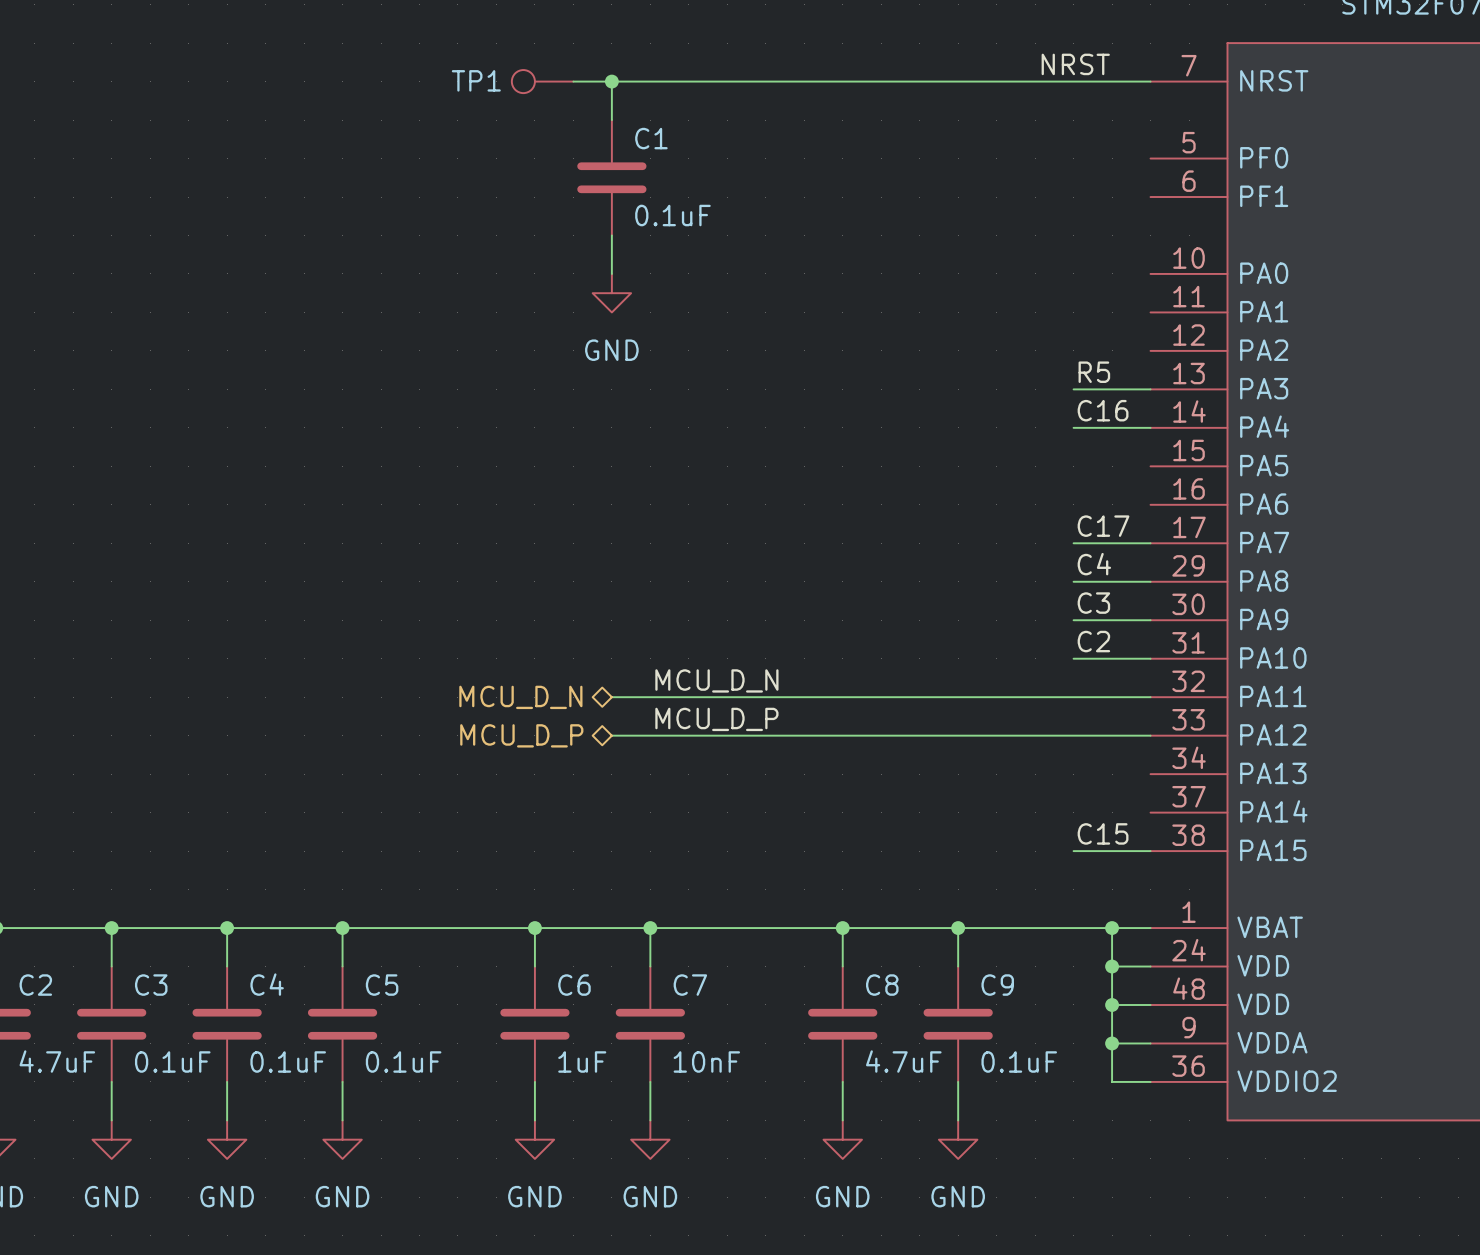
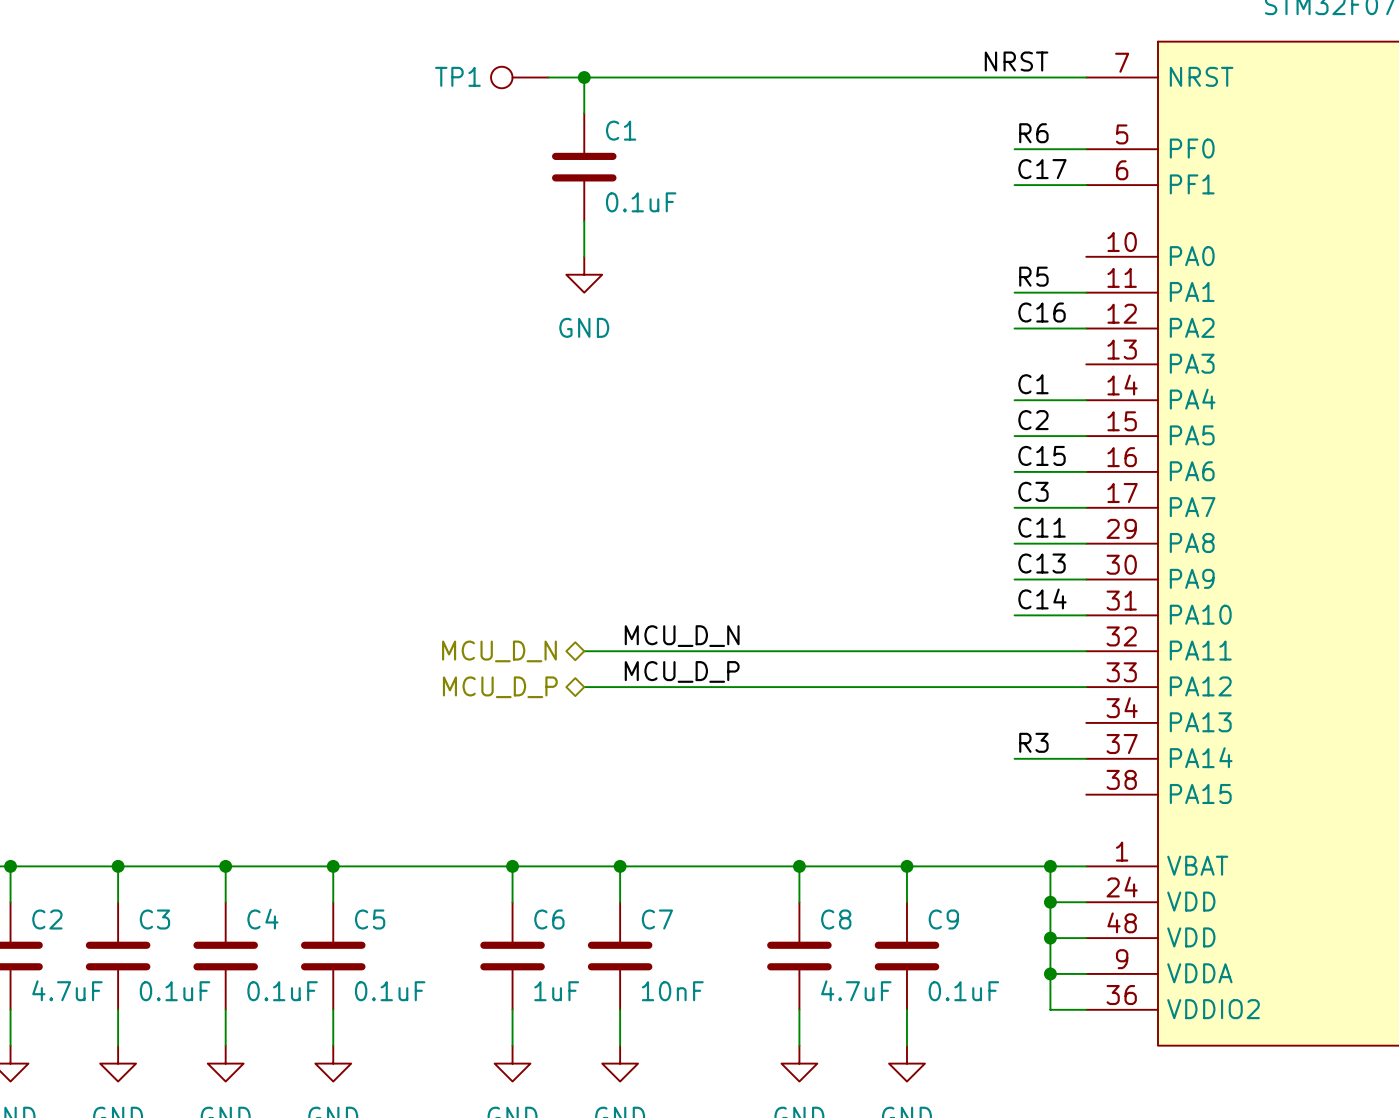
label: none -> R6 (1033, 133)
wire: none -> (1014, 149) (1086, 149)
label: none -> C17 (1042, 169)
wire: none -> (1014, 185) (1086, 185)
wire: none -> (1014, 292) (1086, 292)
label: none -> C16 (1042, 312)
label position: R5 (1094, 372) -> R5 (1033, 276)
wire: (1073, 389) (1150, 389) -> (1014, 328) (1086, 328)
label: C16 (1103, 410) -> C1 (1033, 384)
label: none -> C2 (1033, 420)
wire: none -> (1014, 436) (1086, 436)
wire: none -> (1014, 471) (1086, 471)
label: C17 (1103, 526) -> C3 (1033, 491)
label: C4 (1094, 564) -> C11 (1042, 527)
label: C3 (1093, 603) -> C13 (1042, 563)
label: C2 (1093, 641) -> C14 (1042, 598)
label: none -> R3 (1033, 742)
label position: C15 (1103, 833) -> C15 (1042, 455)
wire: (1073, 851) (1150, 851) -> (1014, 758) (1086, 758)

